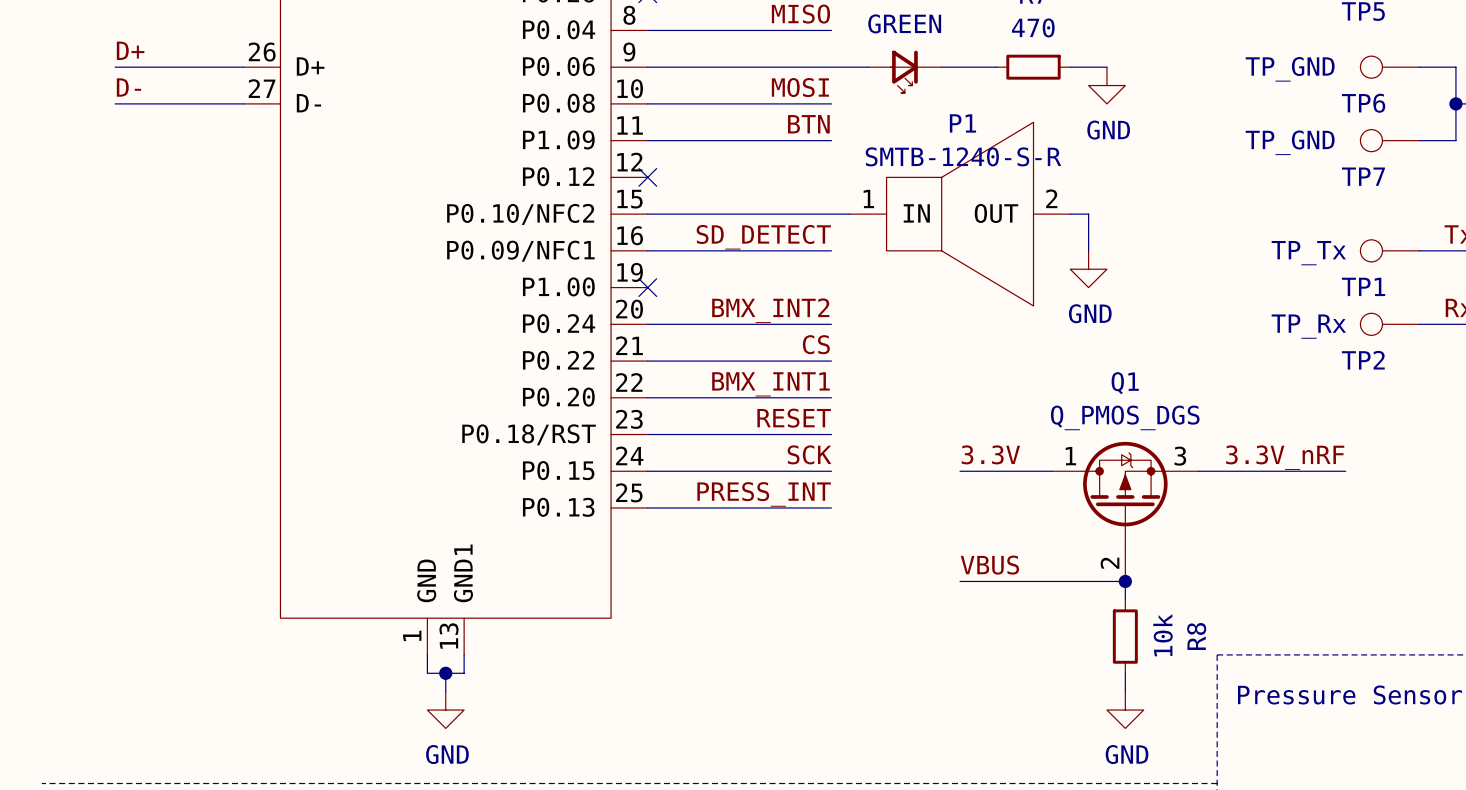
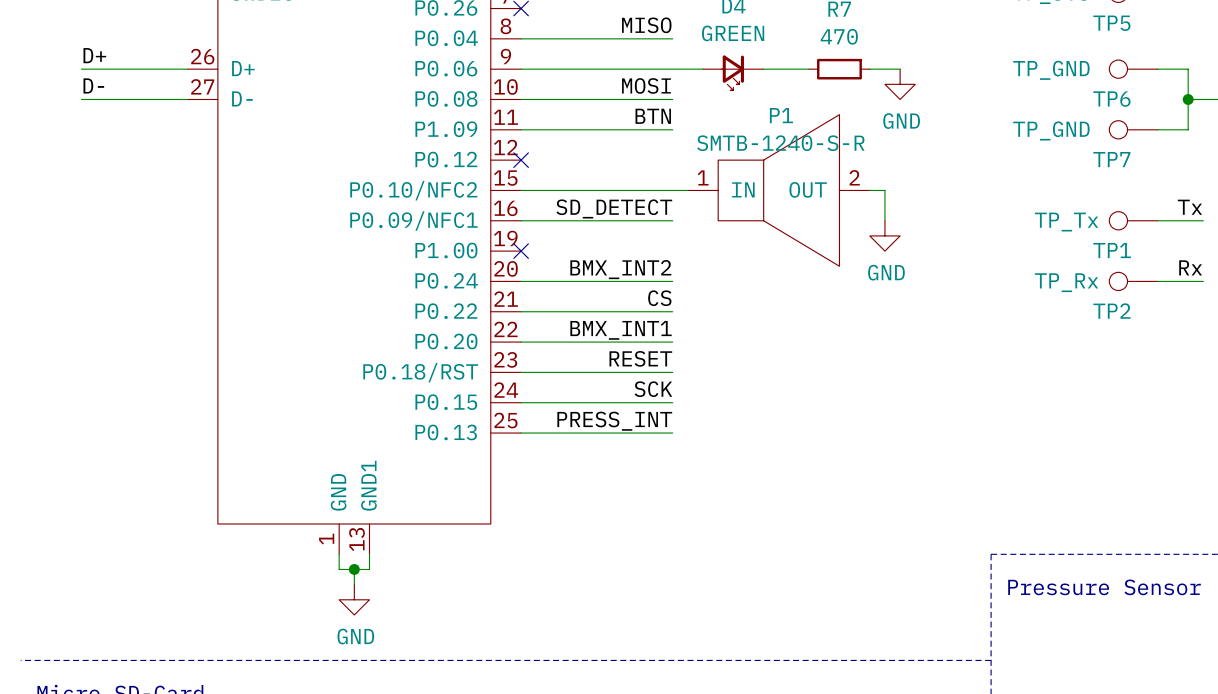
label: 3.3V (990, 454) -> none
label: 3.3V_nRF (1285, 457) -> none
wire: (960, 471) (1051, 471) -> none
wire: (1198, 471) (1345, 471) -> none
Q1: Q_PMOS_DGS (1125, 511) -> none
label: VBUS (989, 565) -> none
wire: (960, 581) (1125, 581) (1125, 599) -> none
junction: (1125, 581) -> none
R8: 10k (1125, 636) -> none
wire: (1125, 673) (1125, 691) -> none
power symbol: GND (1125, 710) -> none

